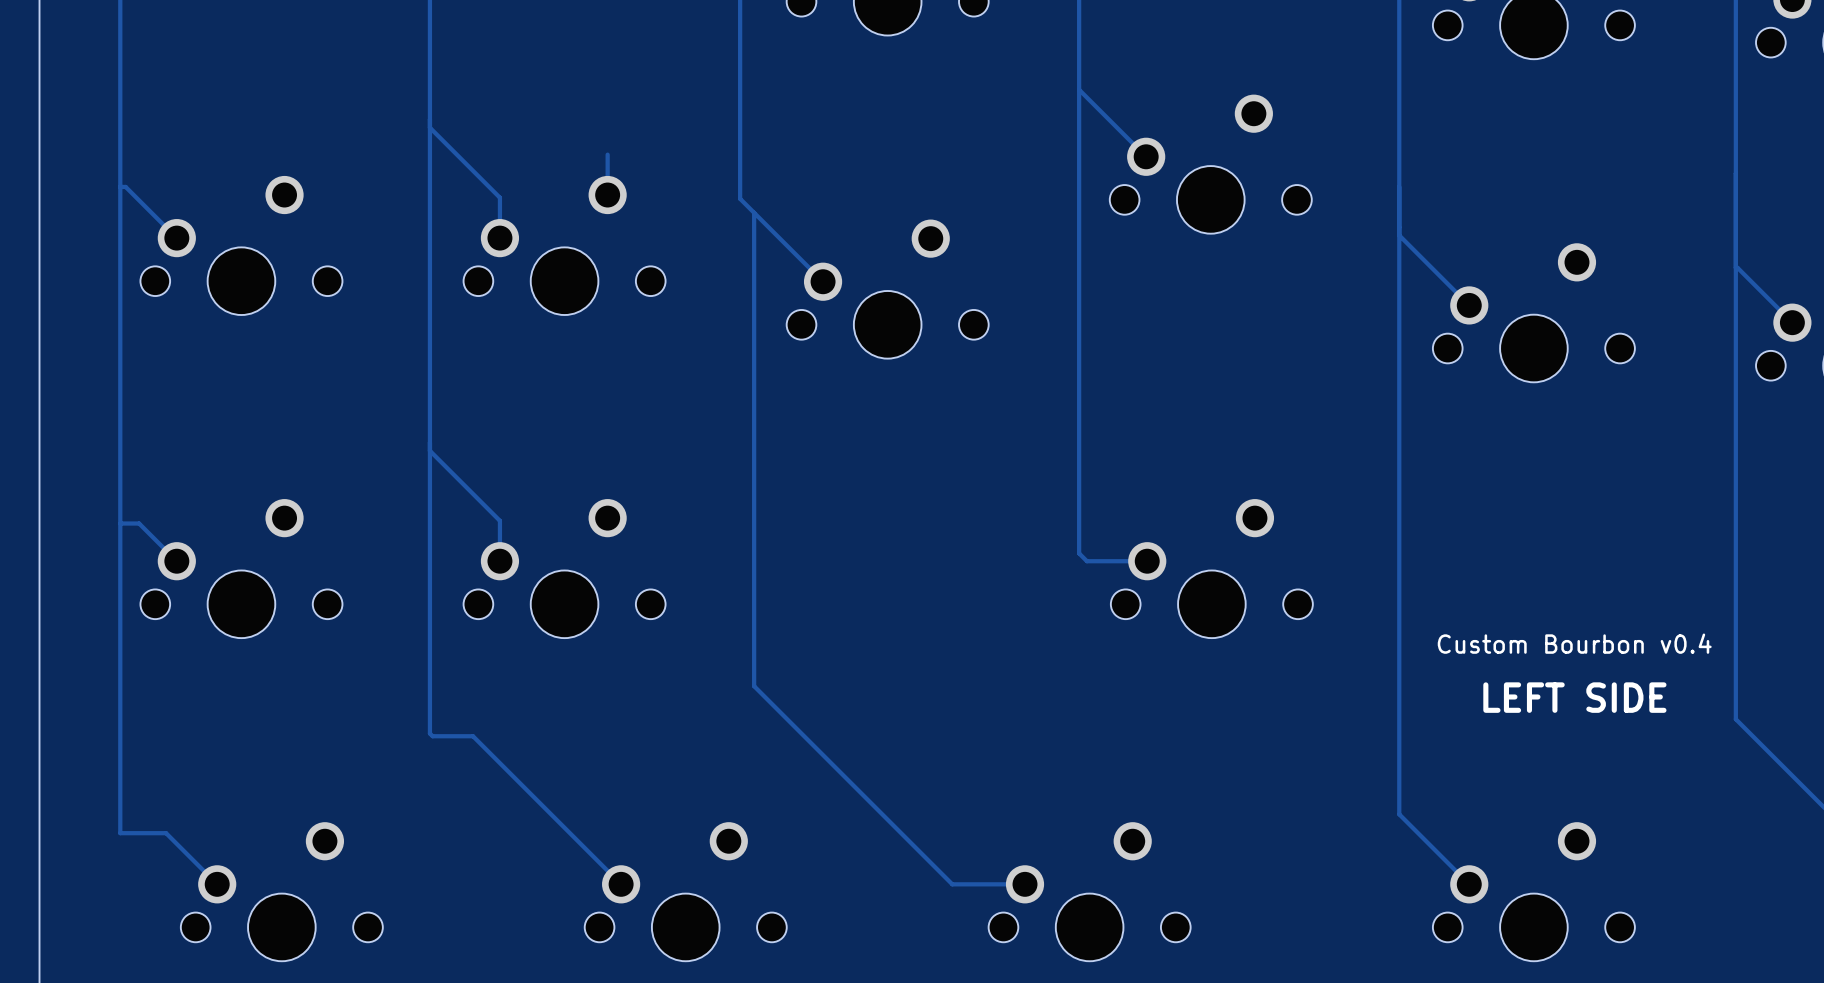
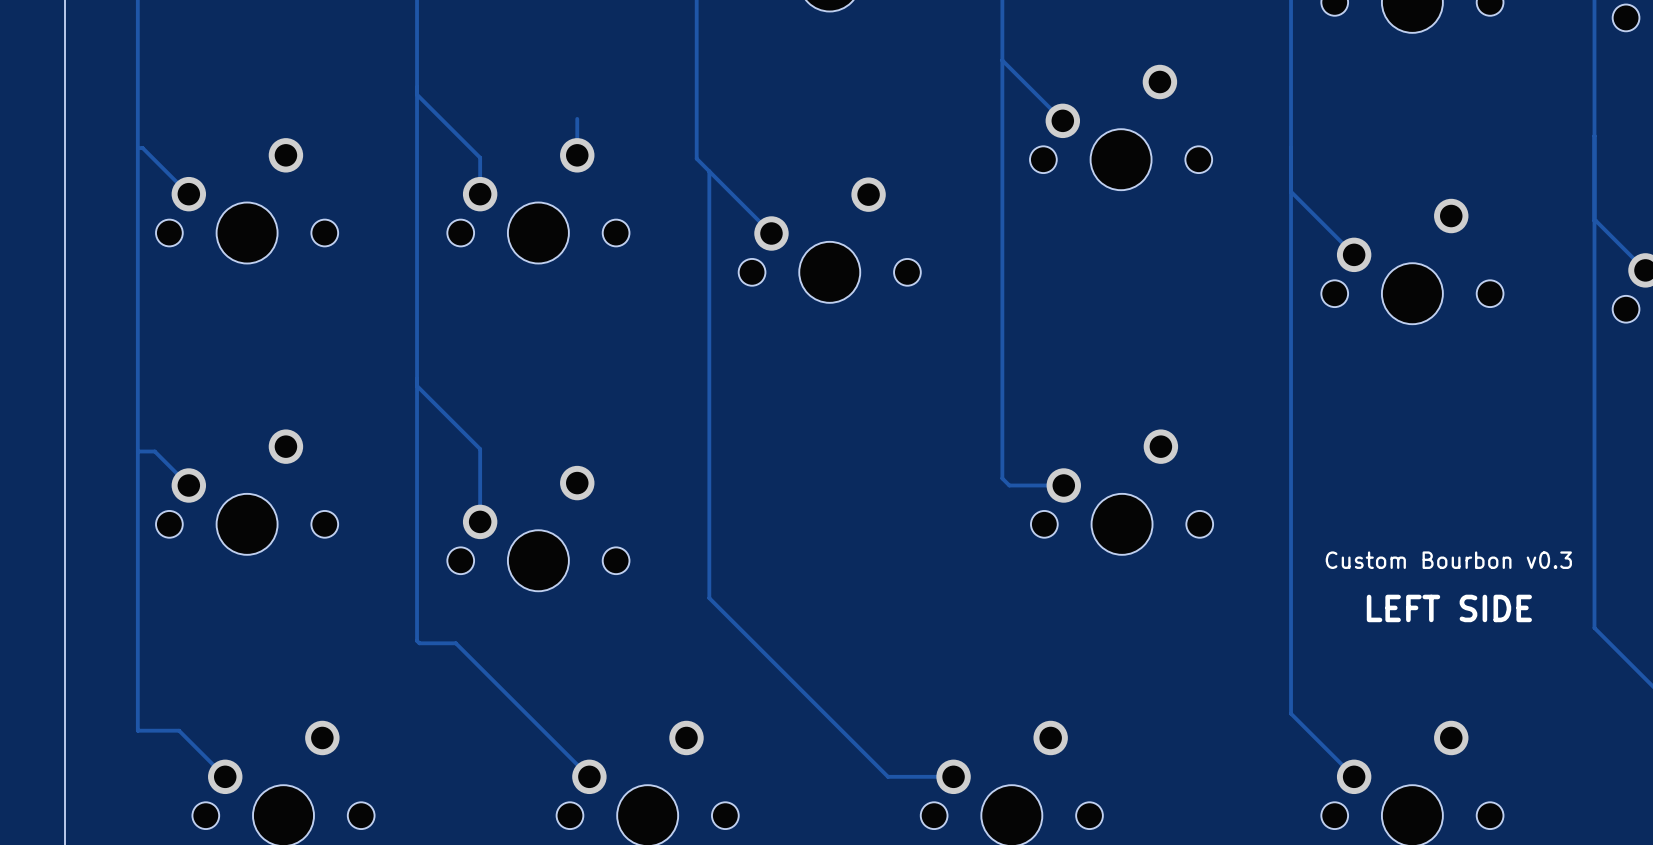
track: none -> (480, 485) (480, 521)
part position: (564, 568) -> (538, 528)
text: Custom Bourbon v0.4 (1574, 643) -> Custom Bourbon v0.3 (1448, 560)

